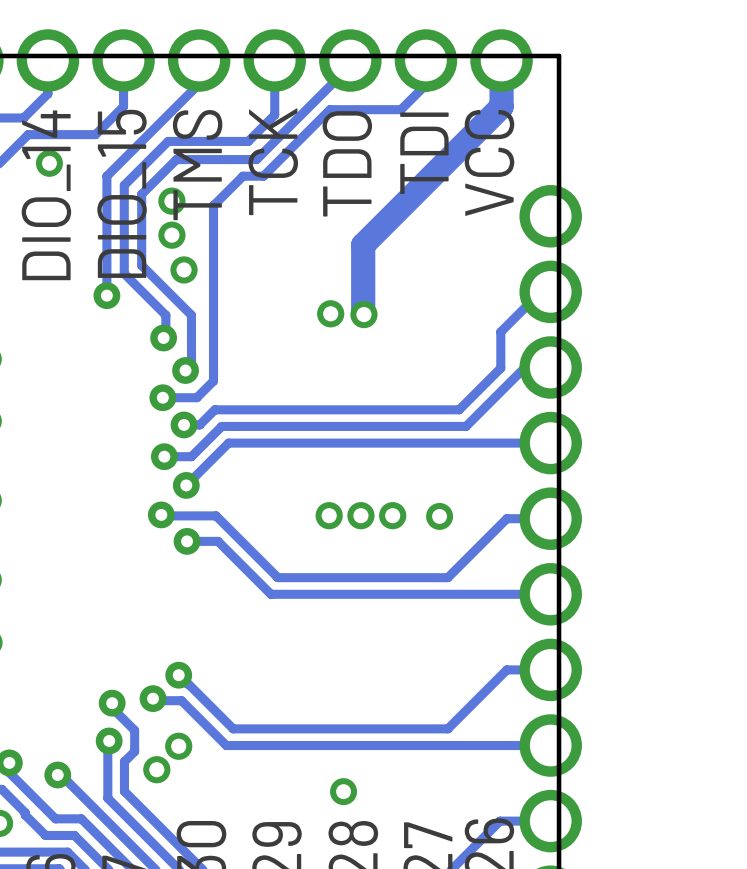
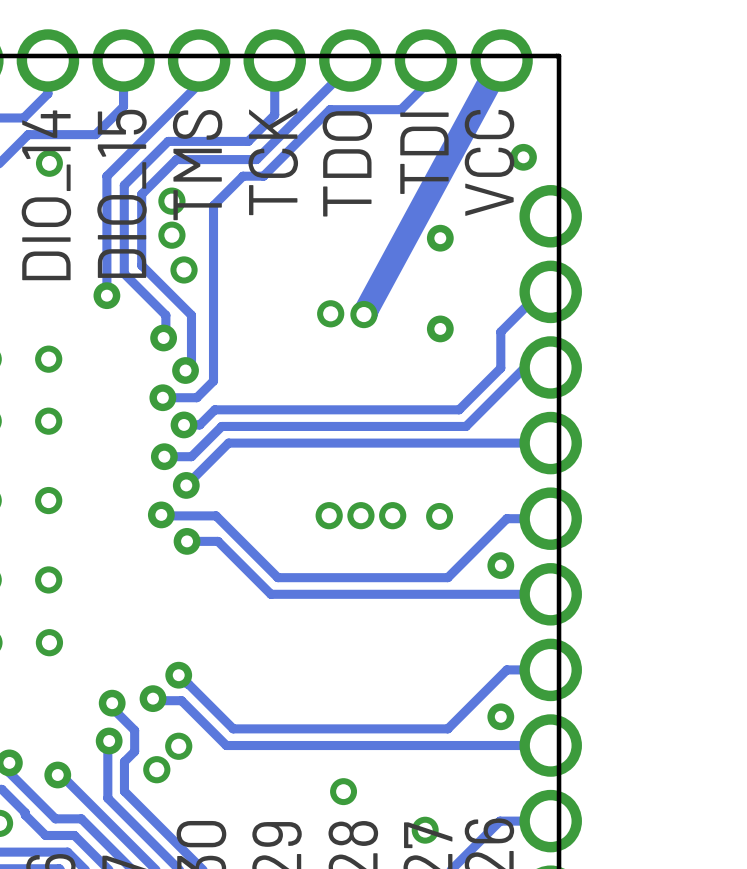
track: (501, 60) (501, 106) (363, 245) (363, 313) -> (500, 60) (501, 60) (363, 314) (366, 312)
via: none -> (523, 157)
via: none -> (440, 238)
via: none -> (440, 328)
via: none -> (48, 359)
via: none -> (48, 421)
via: none -> (48, 500)
via: none -> (500, 565)
via: none -> (48, 579)
via: none -> (49, 642)
via: none -> (500, 716)
via: none -> (425, 830)

